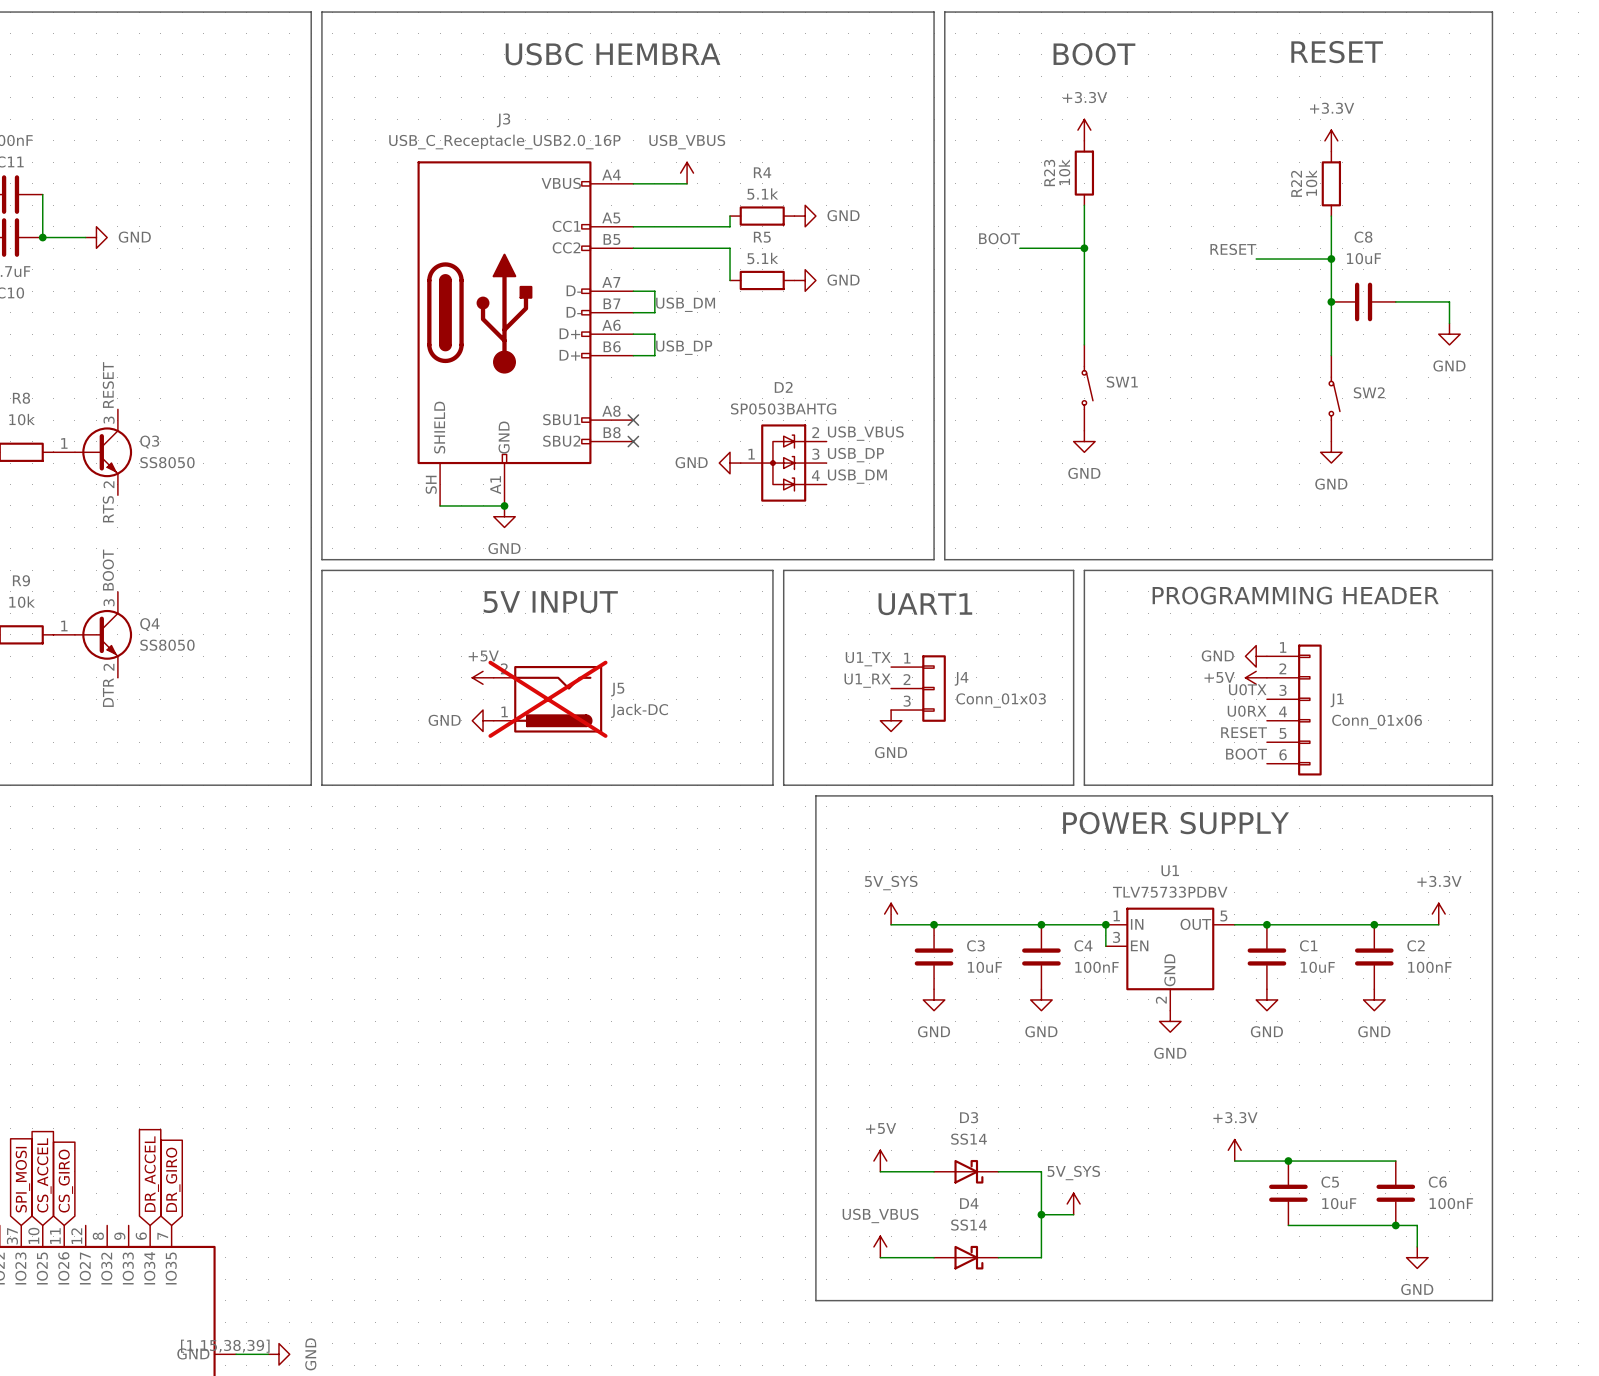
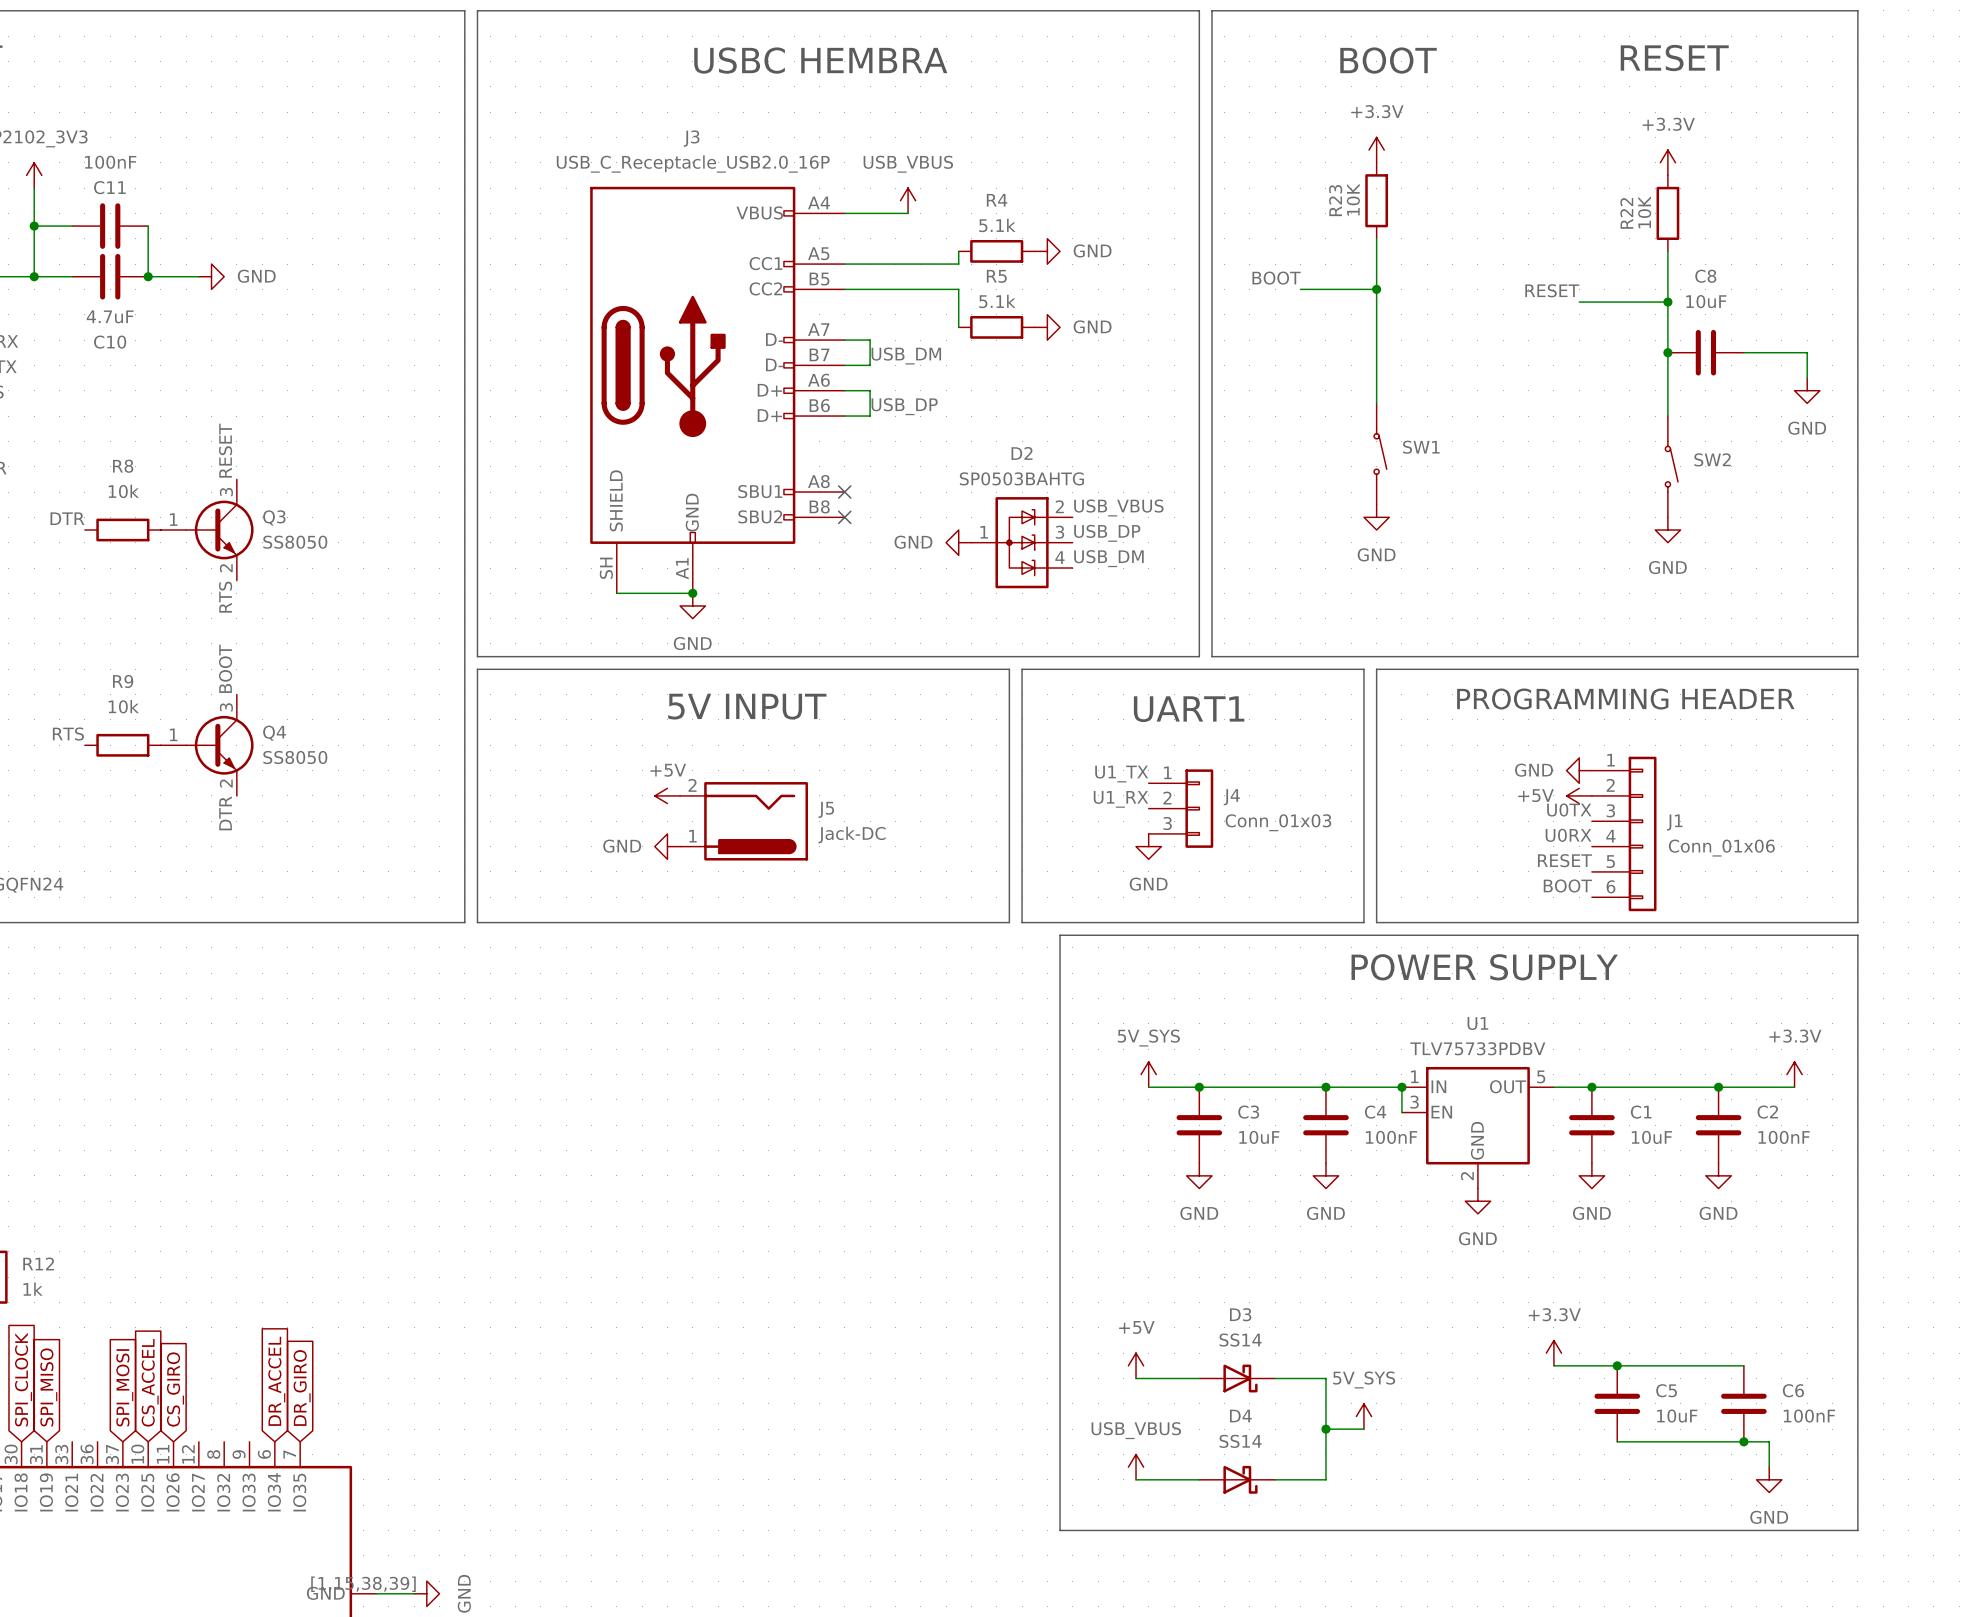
R23 value: 10k (1064, 172) -> 10K (1353, 199)
R22 value: 10k (1311, 183) -> 10K (1644, 212)
J5 do-not-place cross: (547, 699) -> none

